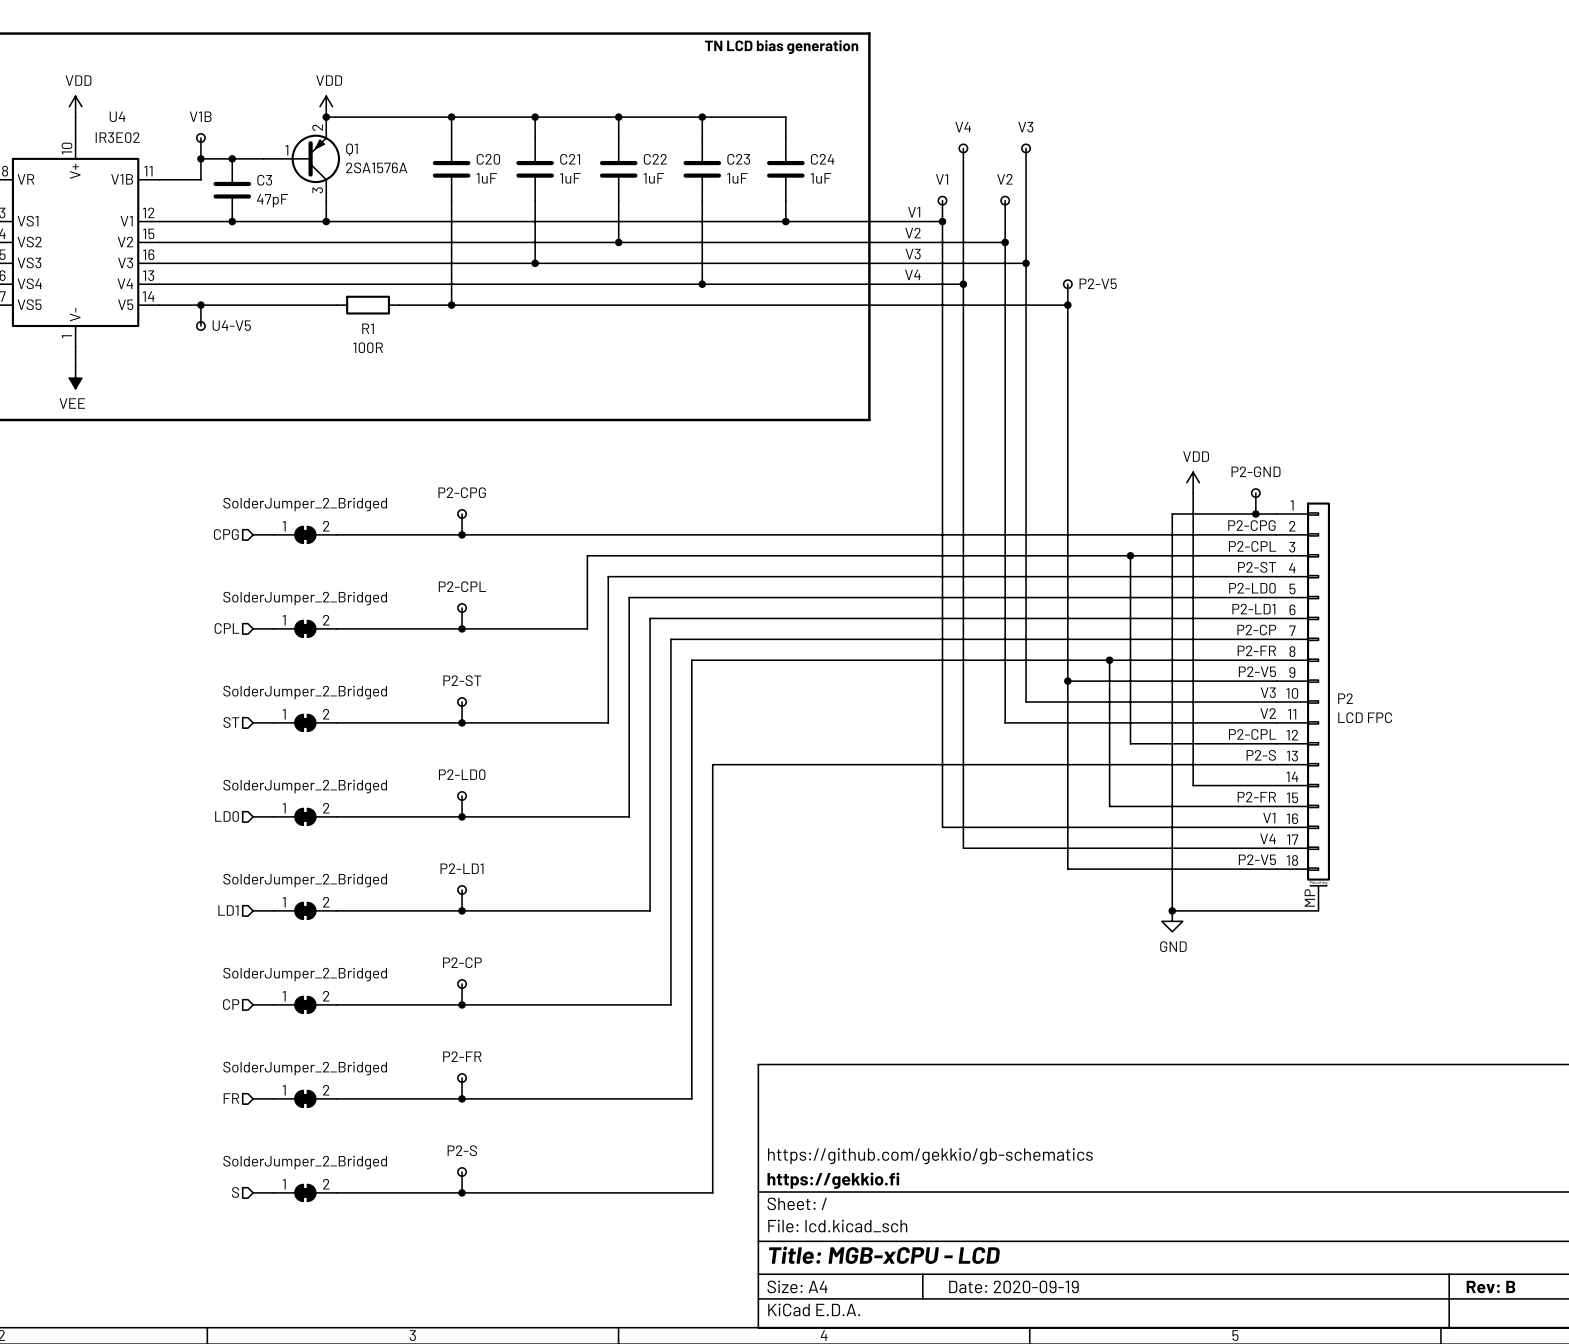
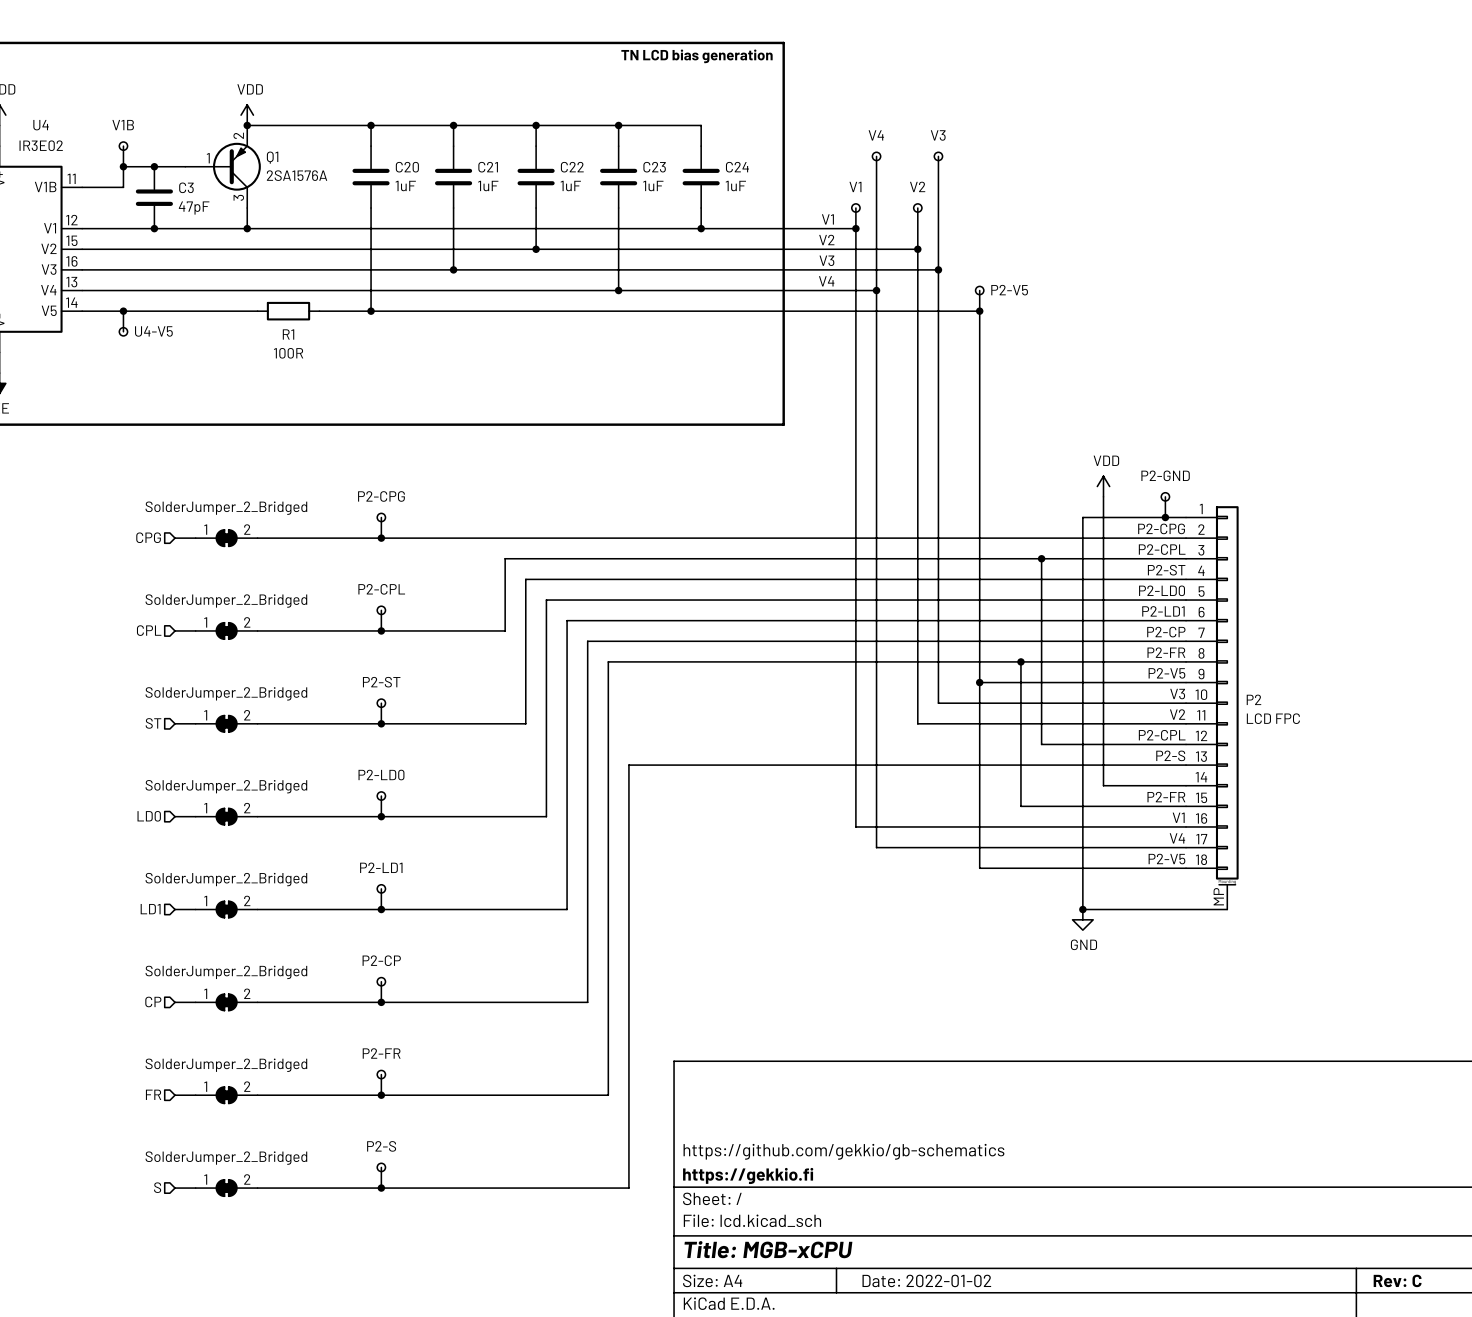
title block: Title: MGB-xCPU - LCD (884, 1255) -> Title: MGB-xCPU (768, 1249)
title block: Date: 2020-09-19 (1013, 1286) -> Date: 2022-01-02 (926, 1280)
title block: Rev: B (1490, 1287) -> Rev: C (1397, 1280)

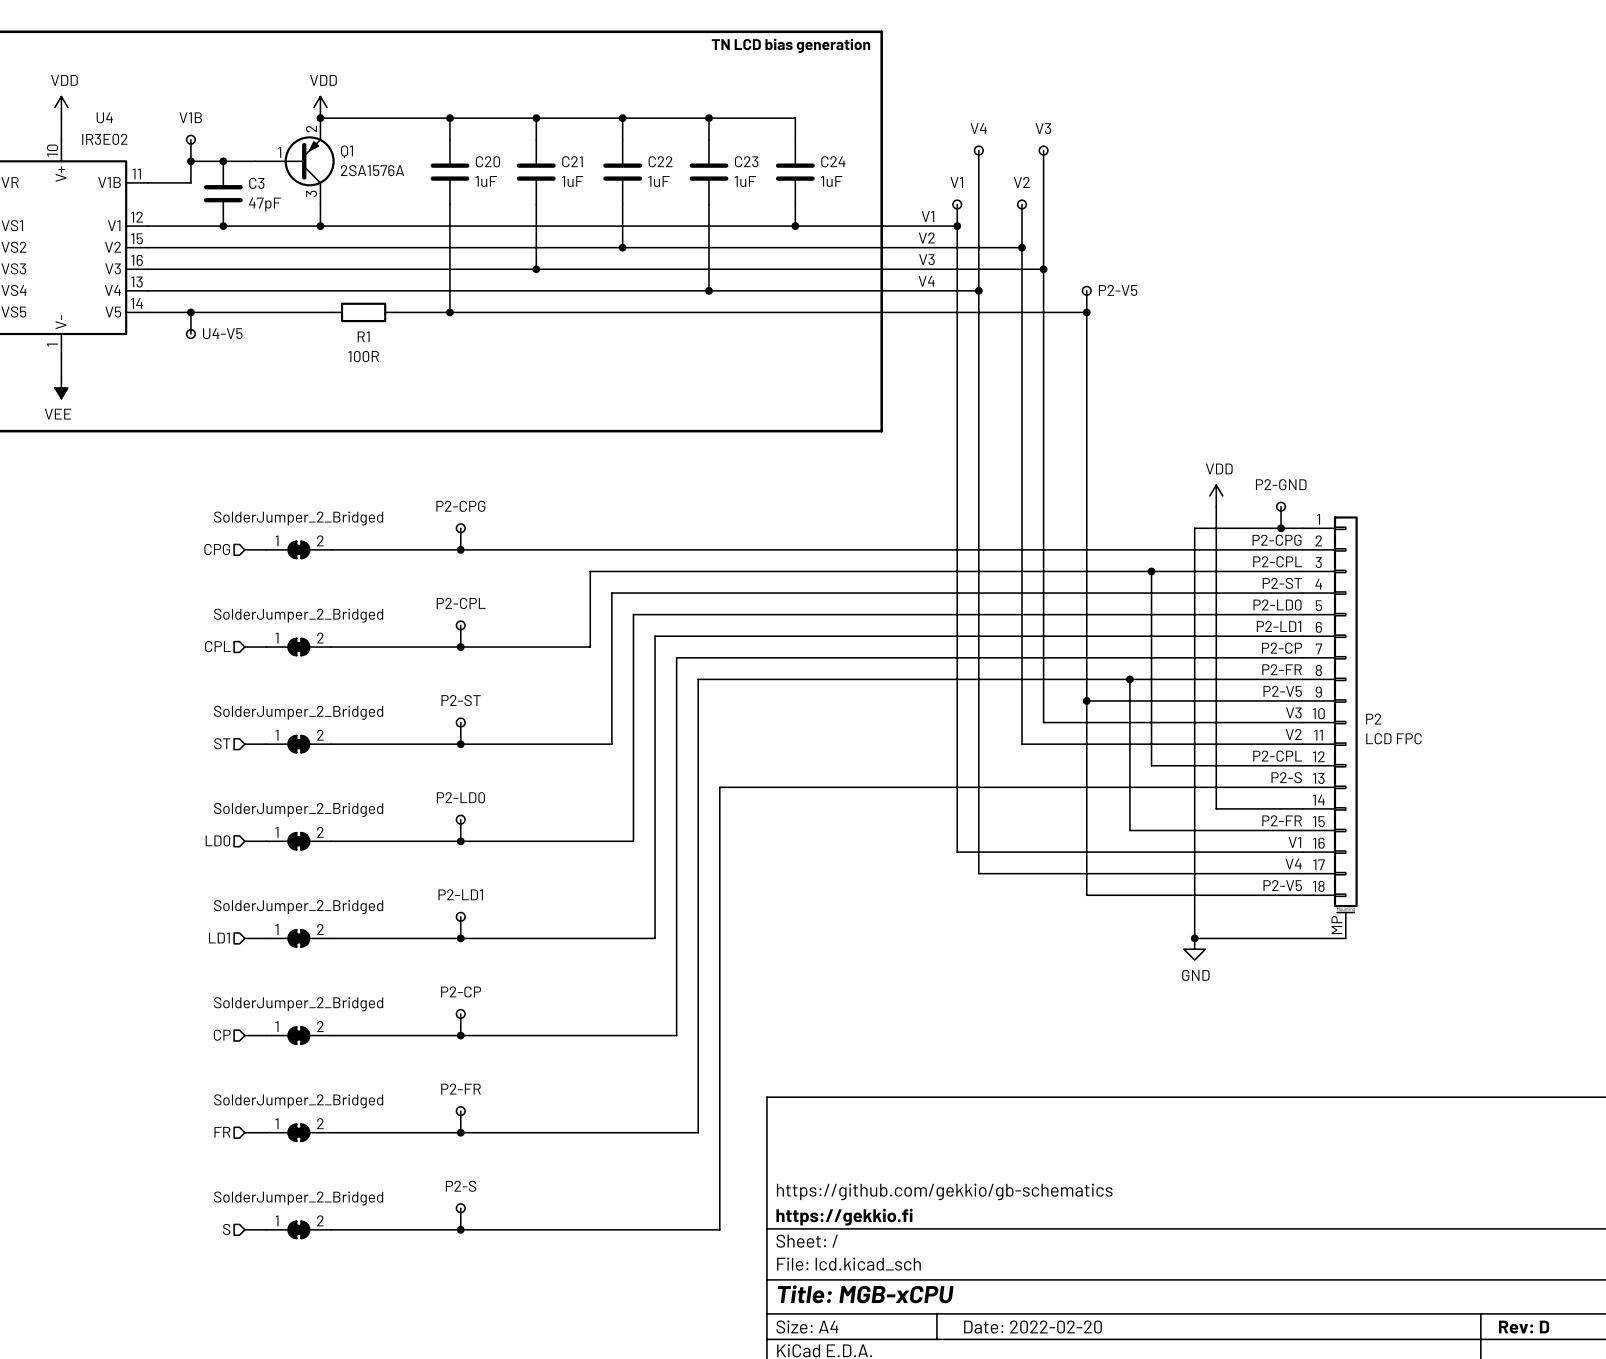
title block: Date: 2022-01-02 (926, 1280) -> Date: 2022-02-20 (1033, 1327)
title block: Rev: C (1397, 1280) -> Rev: D (1524, 1327)

